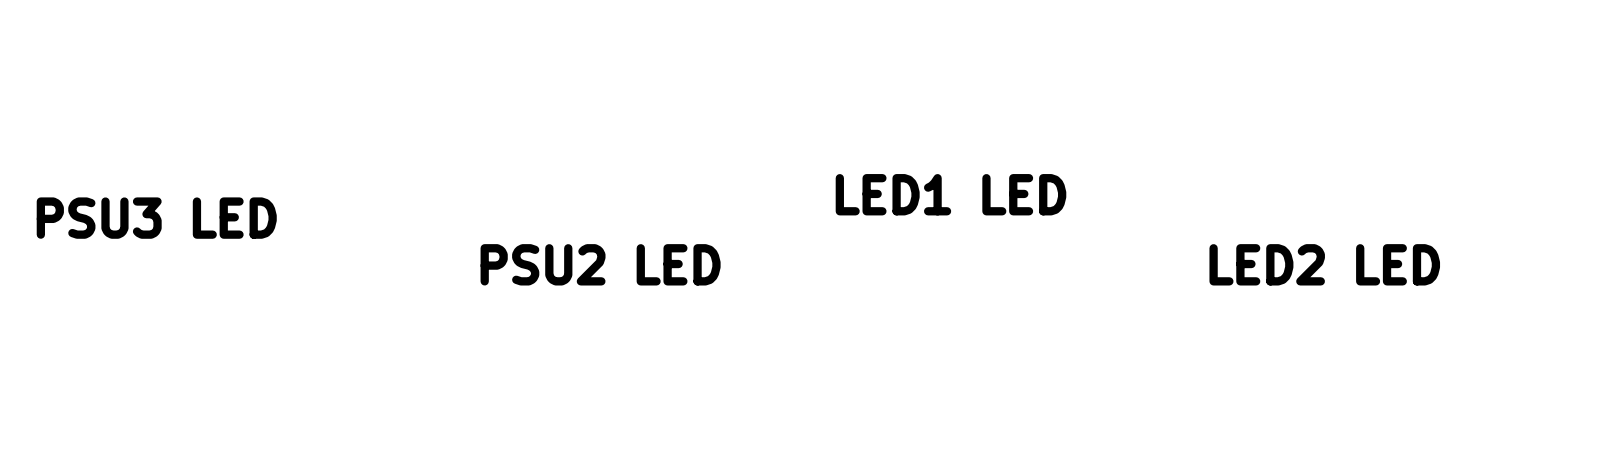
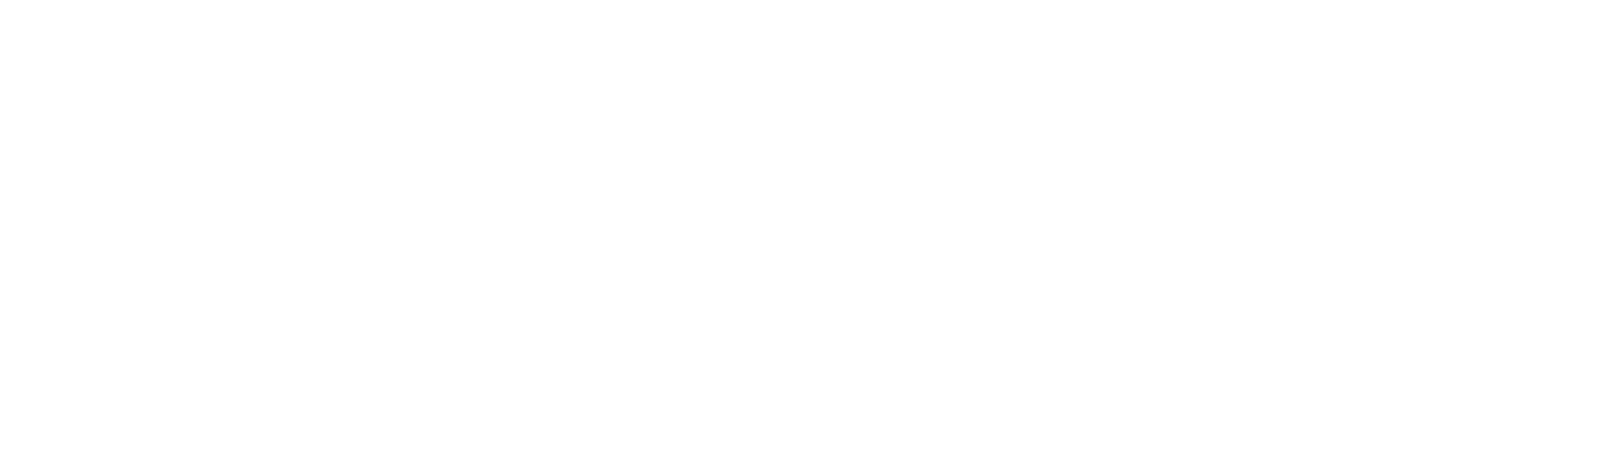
text: LED1 LED (950, 194) -> none
text: PSU3 LED (156, 218) -> none
text: PSU2 LED (600, 264) -> none
text: LED2 LED (1324, 264) -> none

